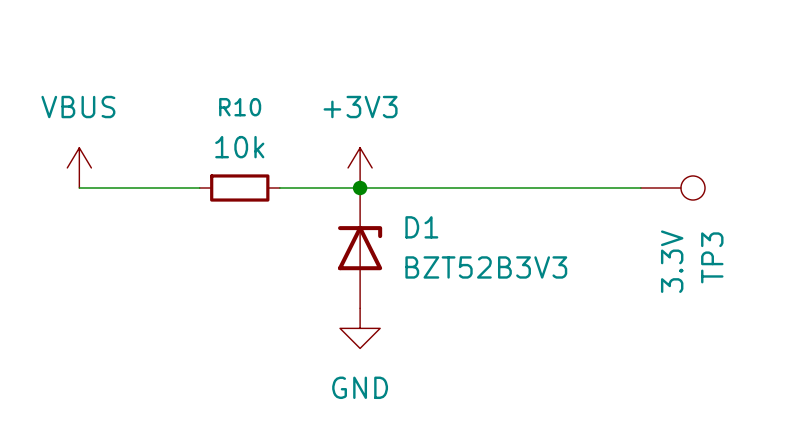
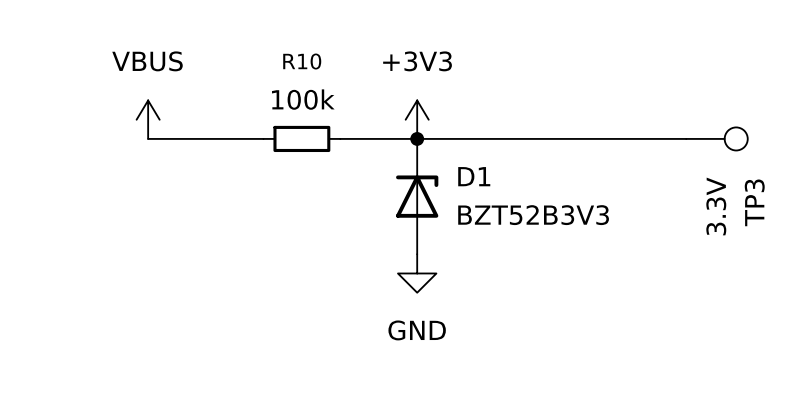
R10 value: 10k (239, 147) -> 100k (303, 99)

